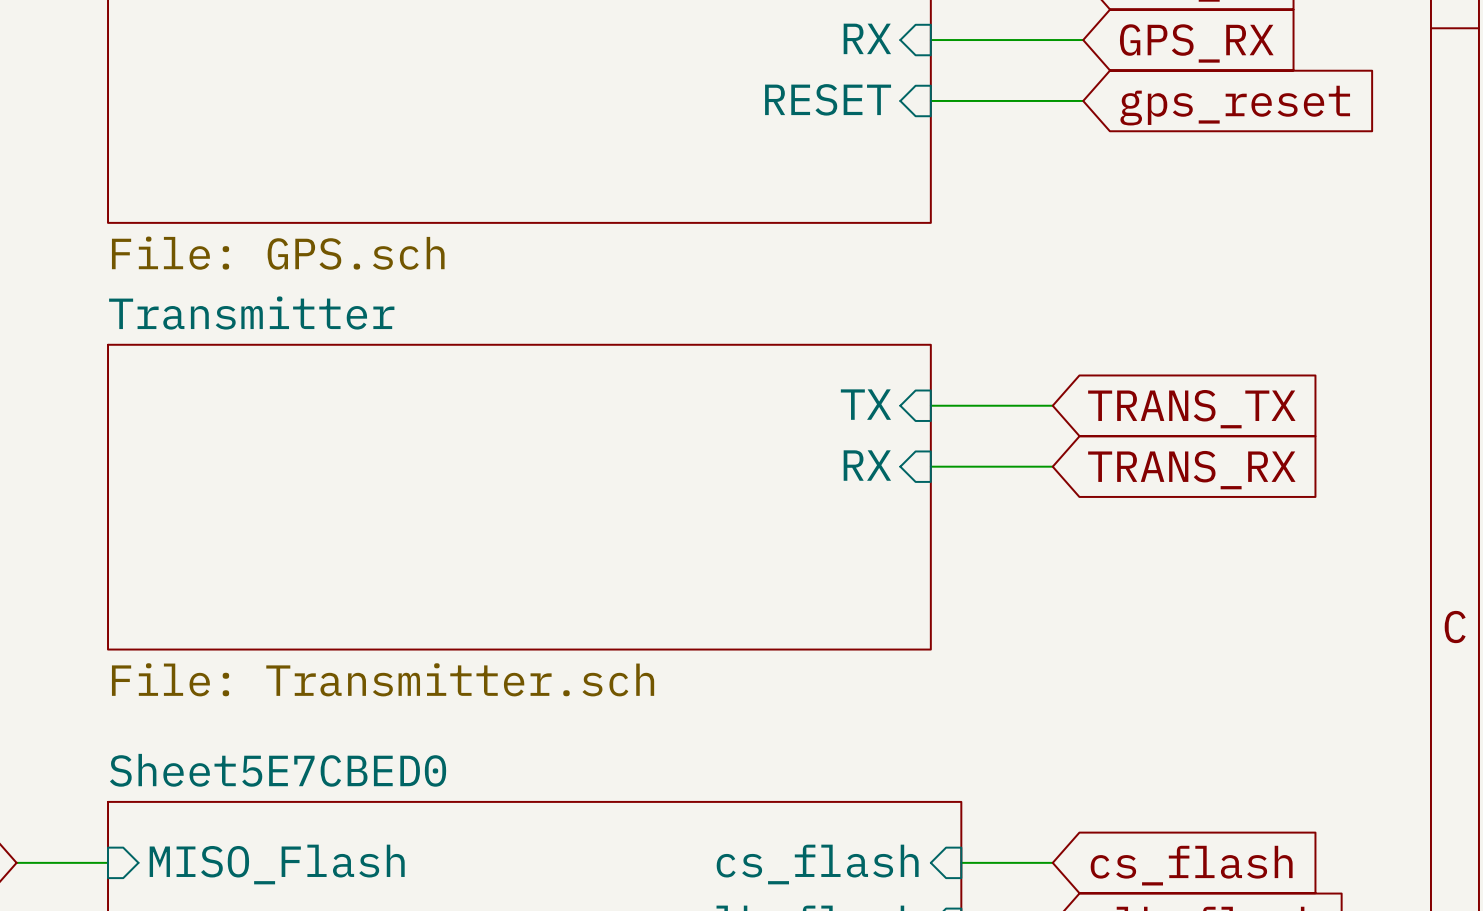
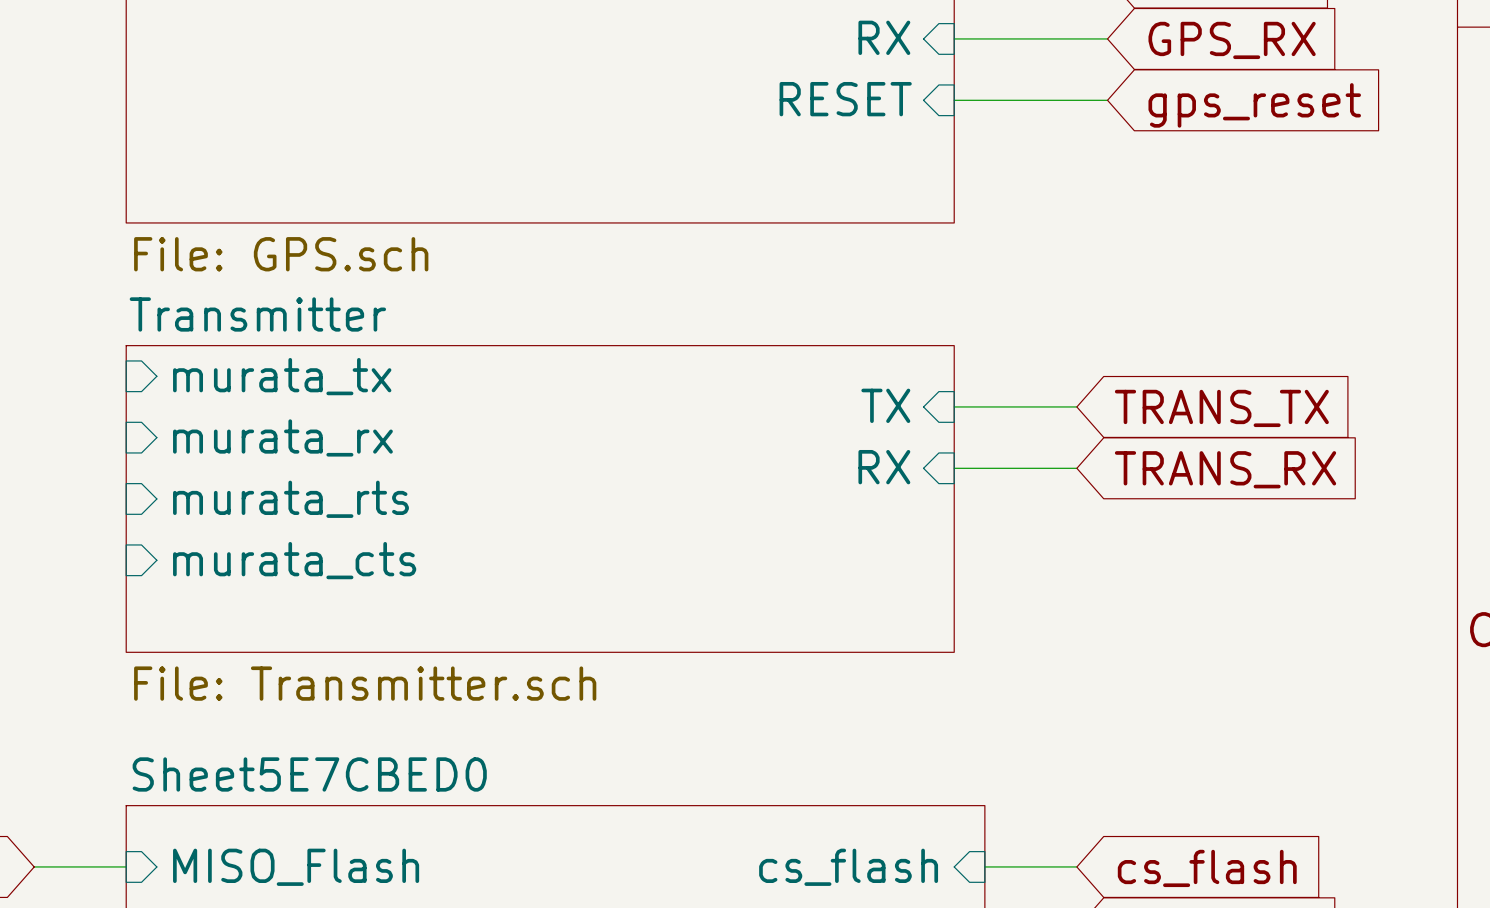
sheet pin: none -> murata_tx (282, 376)
sheet pin: none -> murata_rx (282, 437)
sheet pin: none -> murata_rts (290, 499)
sheet pin: none -> murata_cts (294, 560)

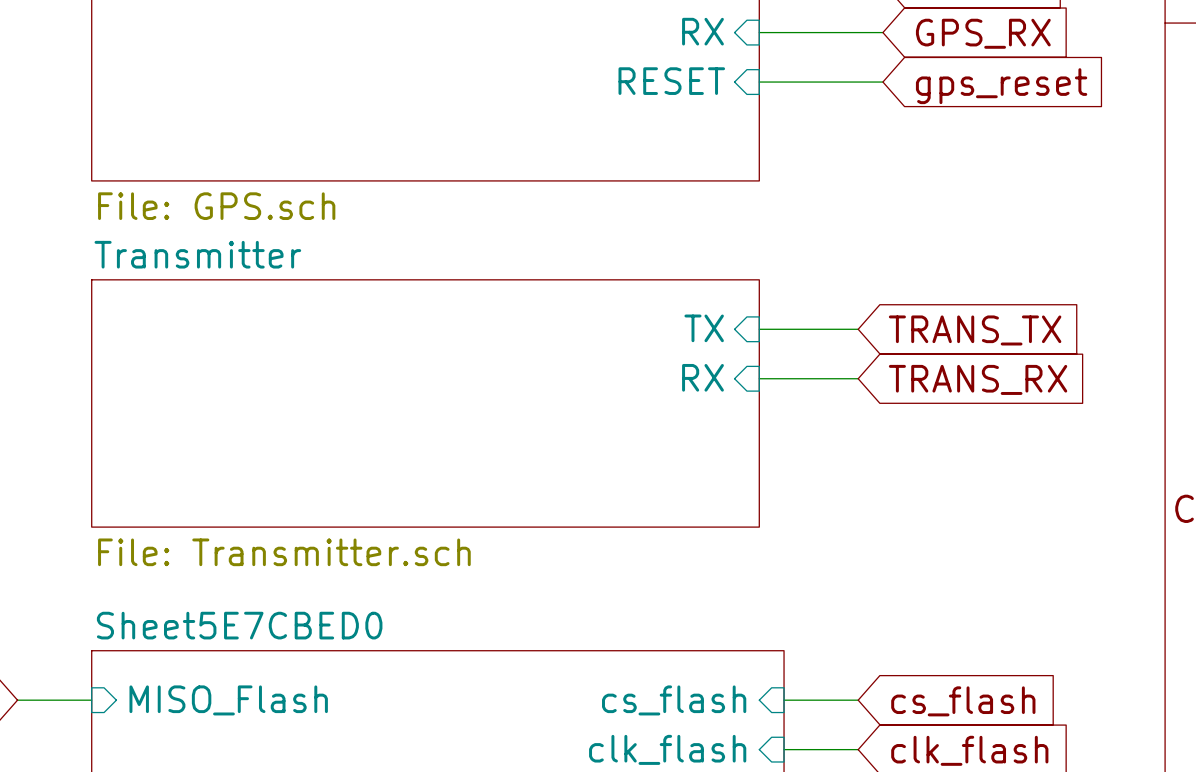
sheet pin: murata_tx (282, 376) -> none
sheet pin: murata_rx (282, 437) -> none
sheet pin: murata_rts (290, 499) -> none
sheet pin: murata_cts (294, 560) -> none

